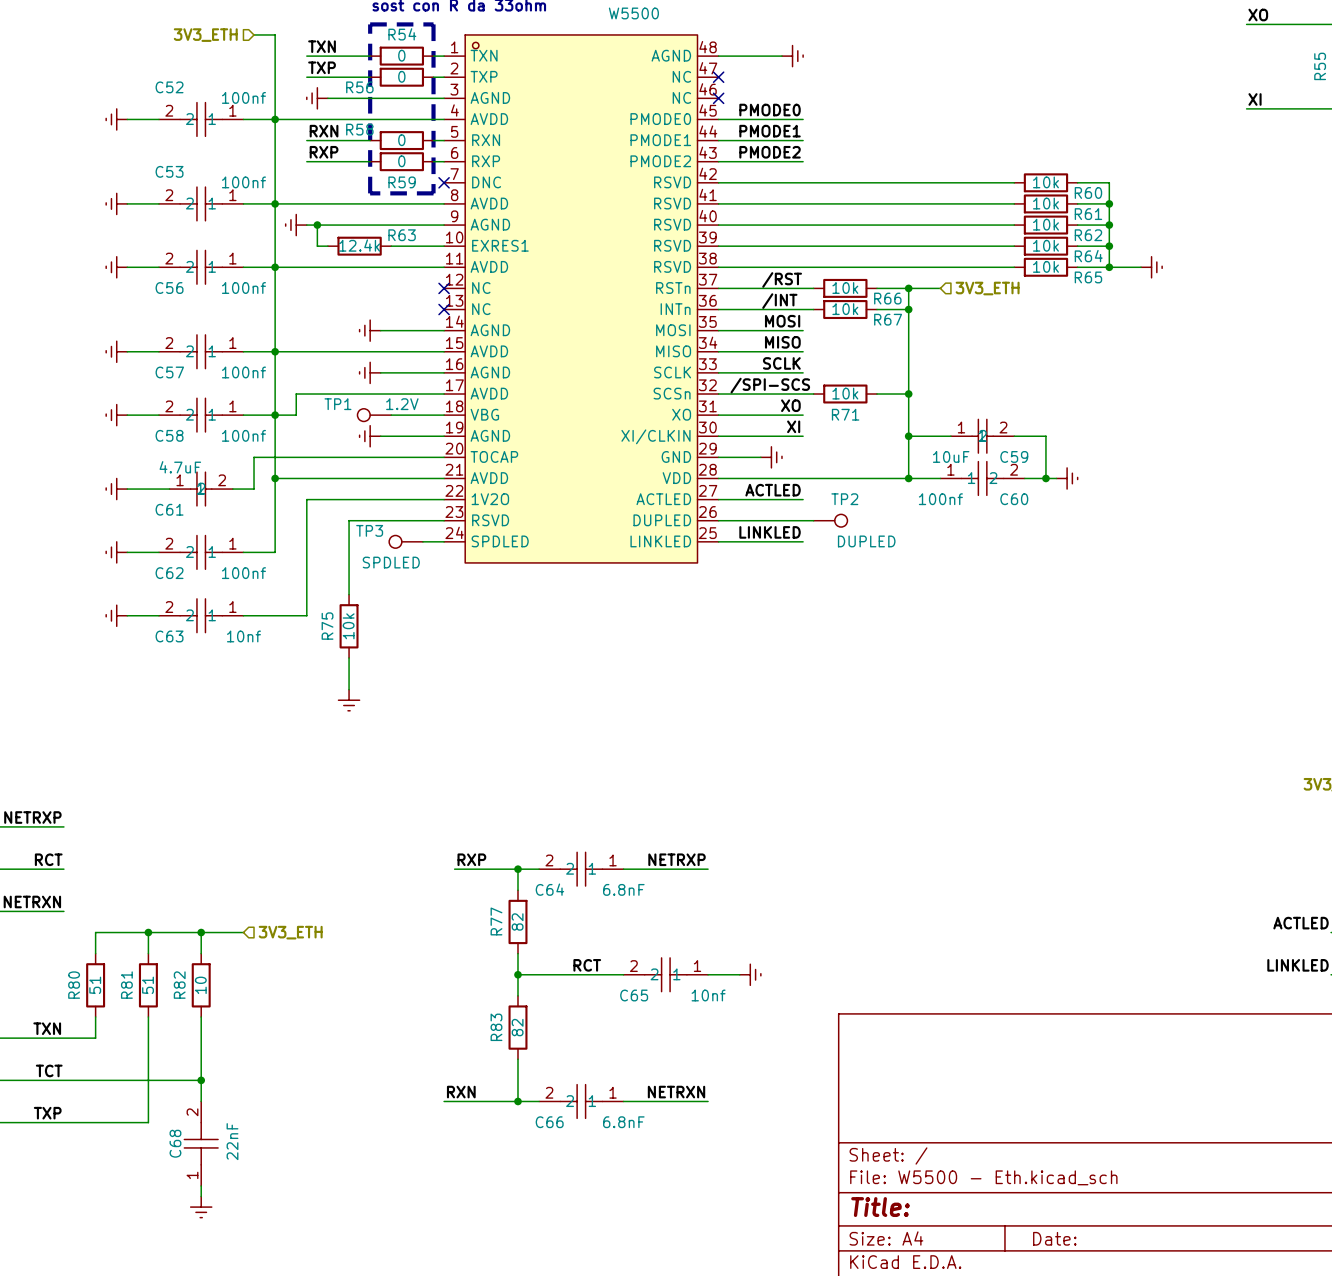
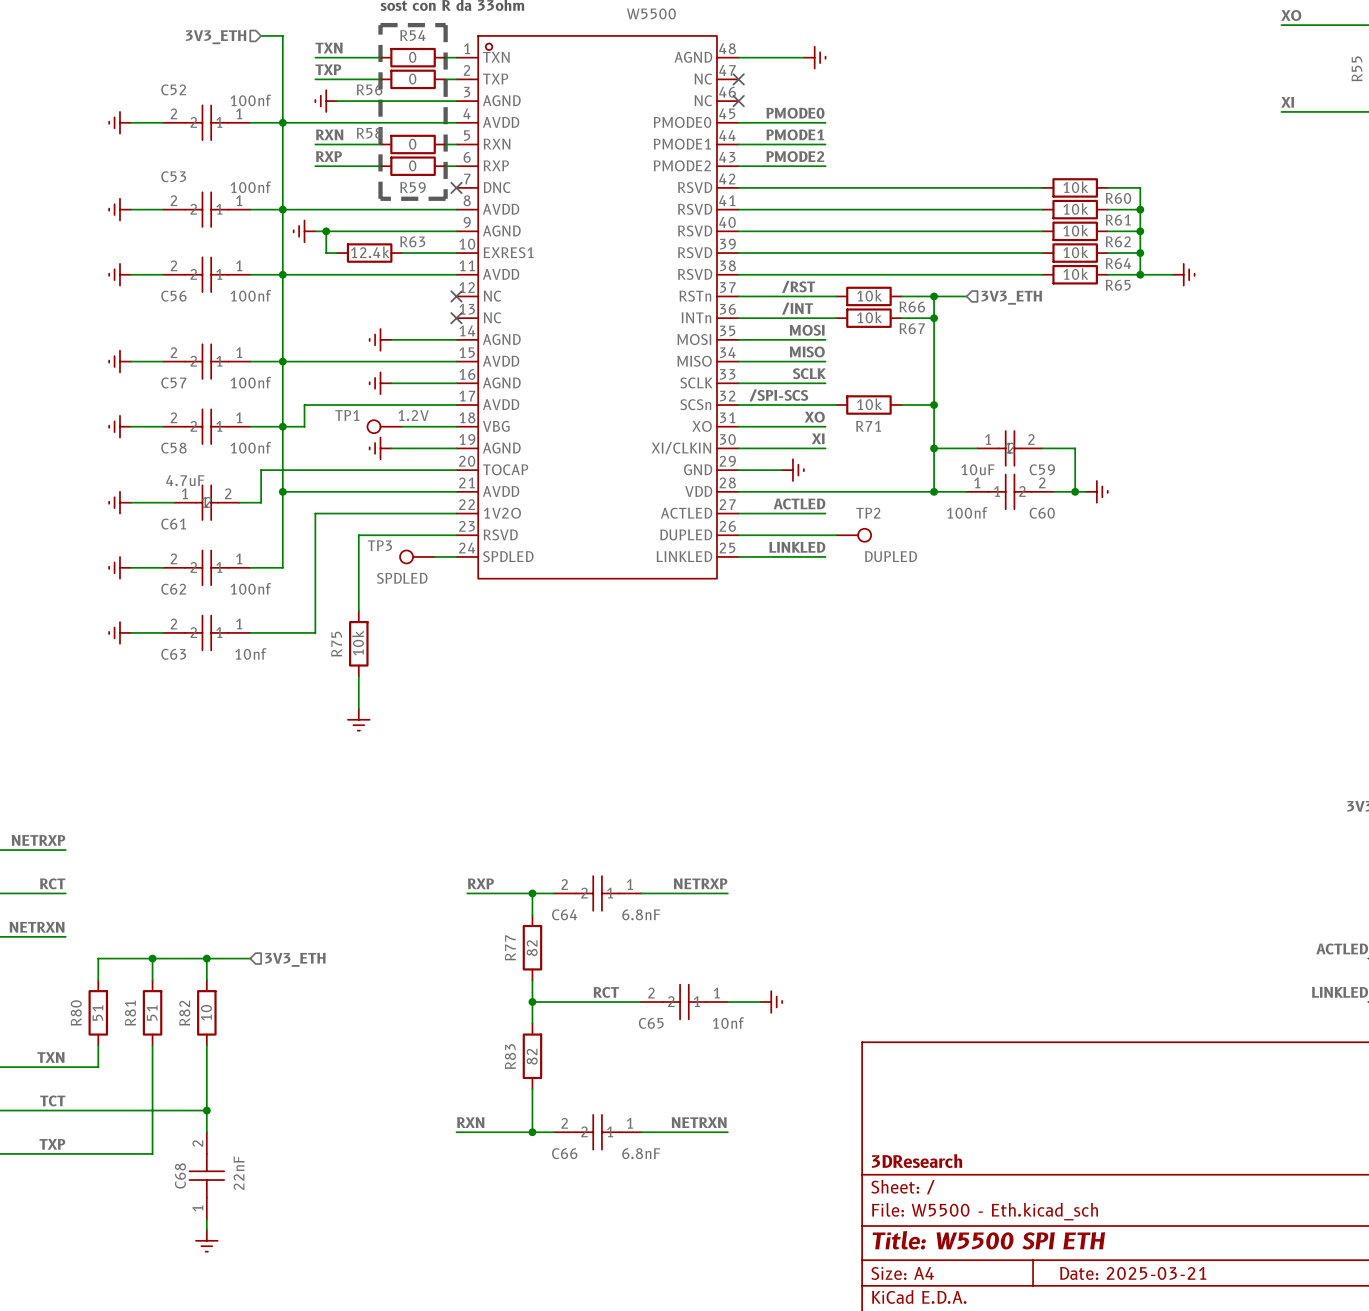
title block: none -> 3DResearch (917, 1161)
title block: Title: (880, 1207) -> Title: W5500 SPI ETH (988, 1240)
title block: Date: (1054, 1238) -> Date: 2025-03-21 (1133, 1273)

